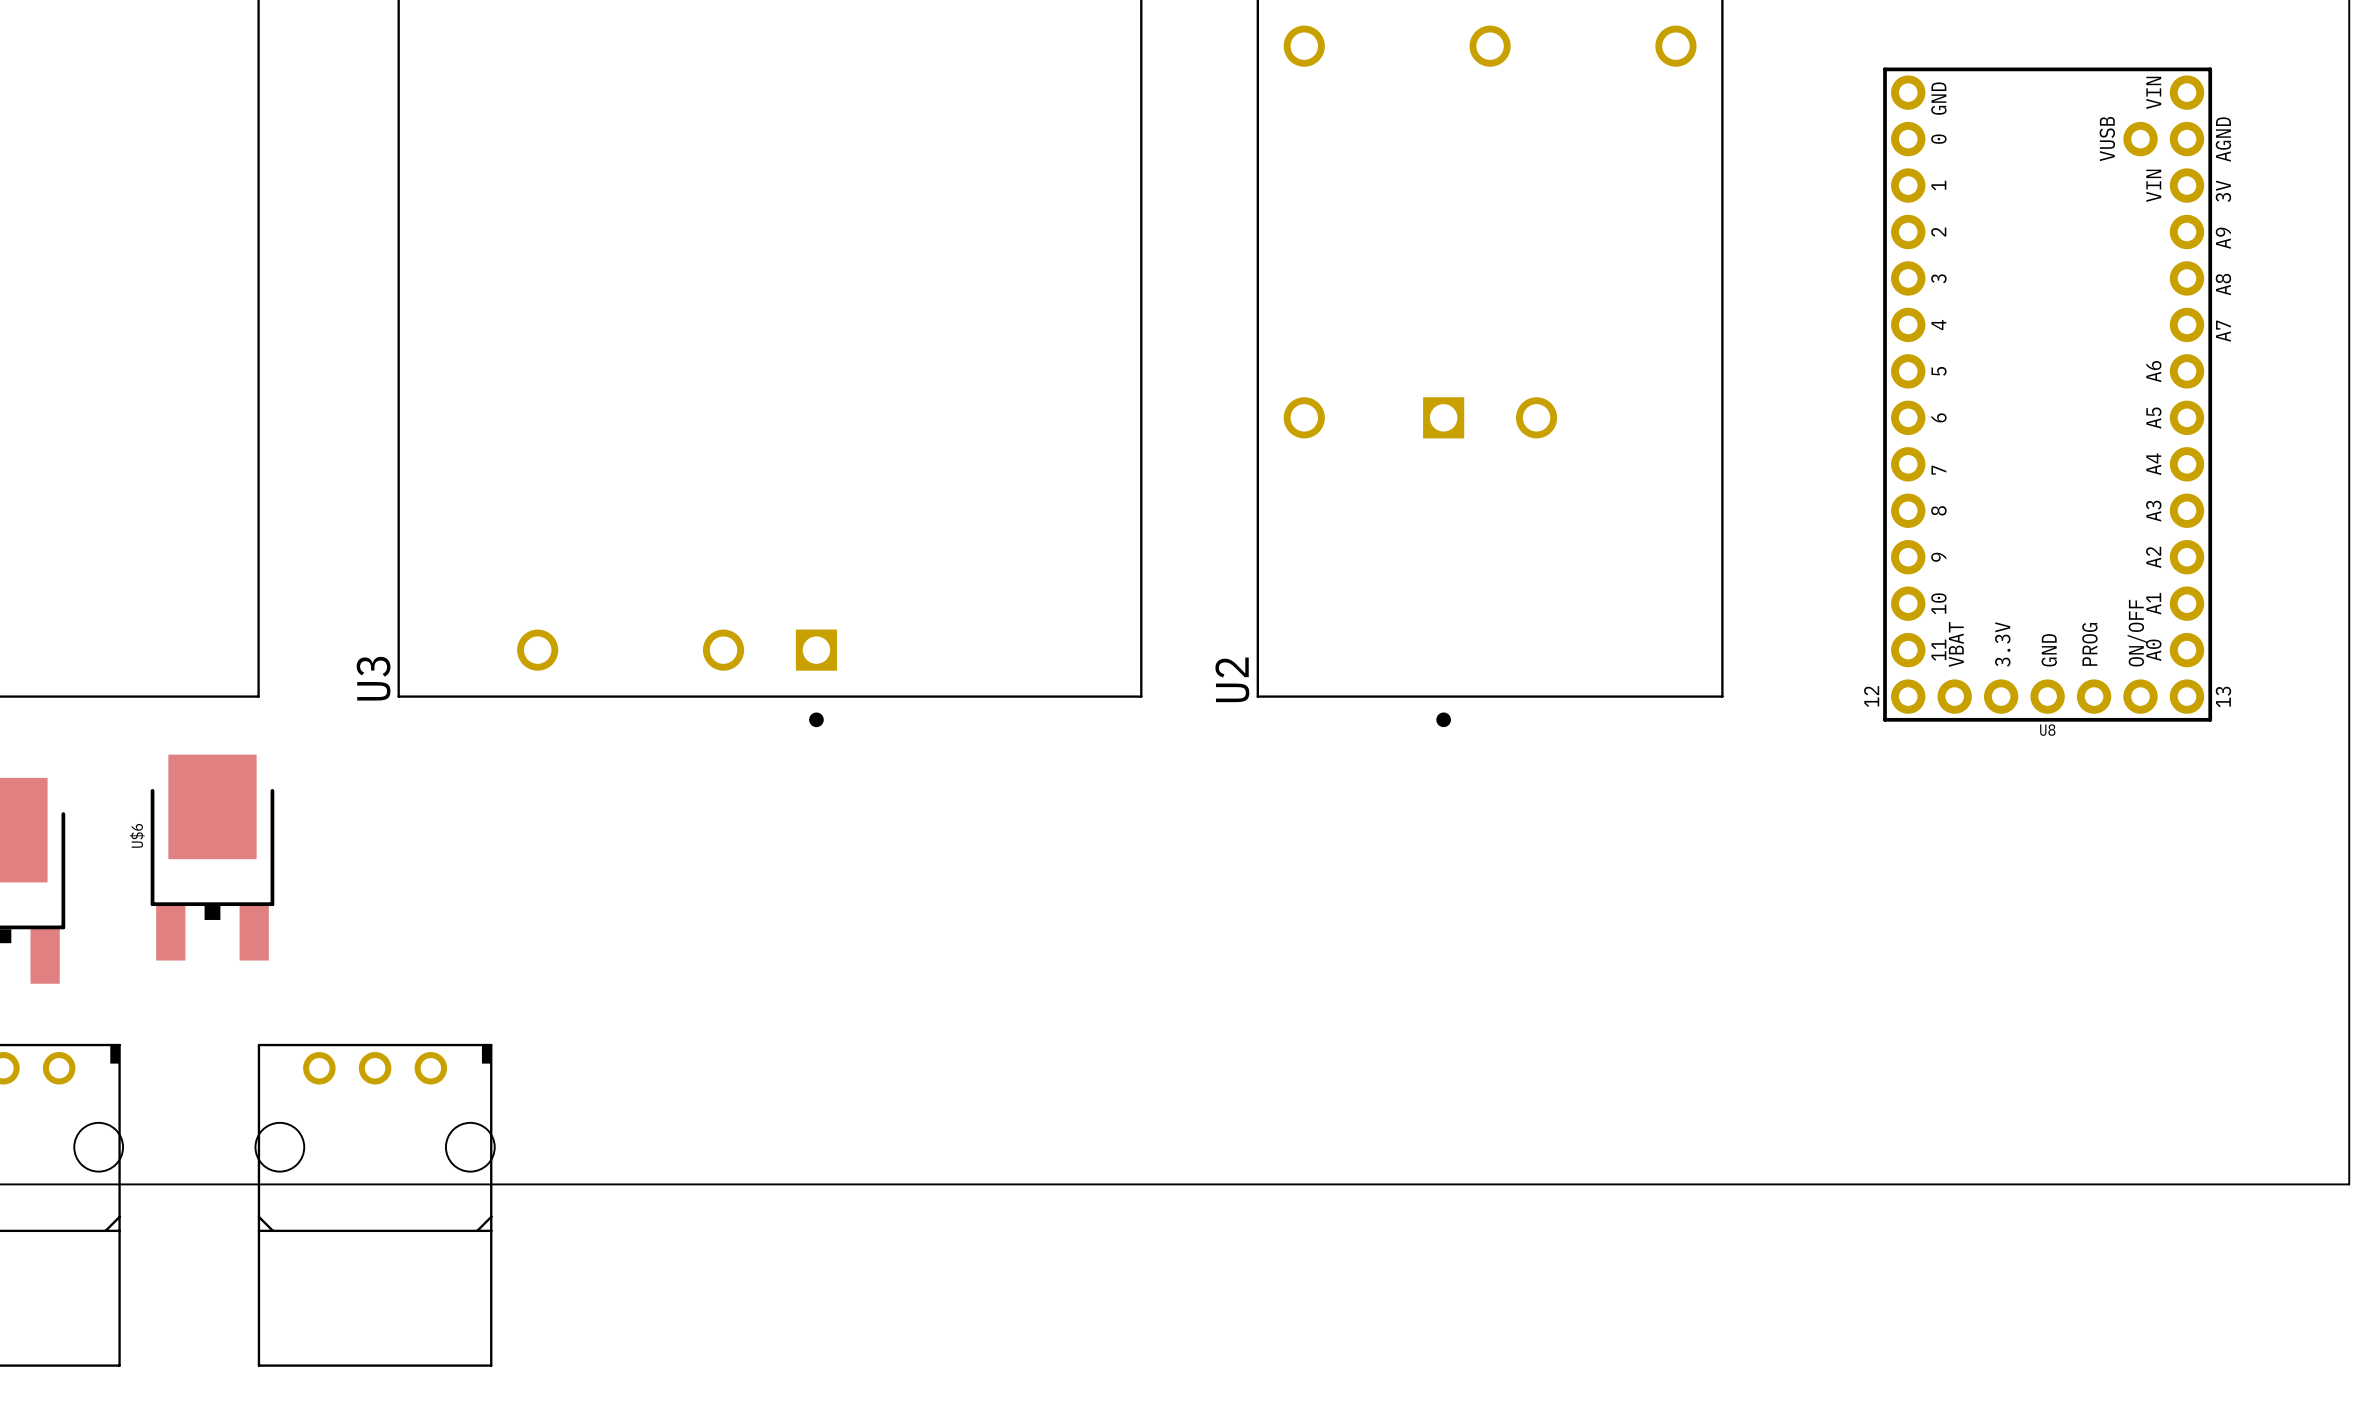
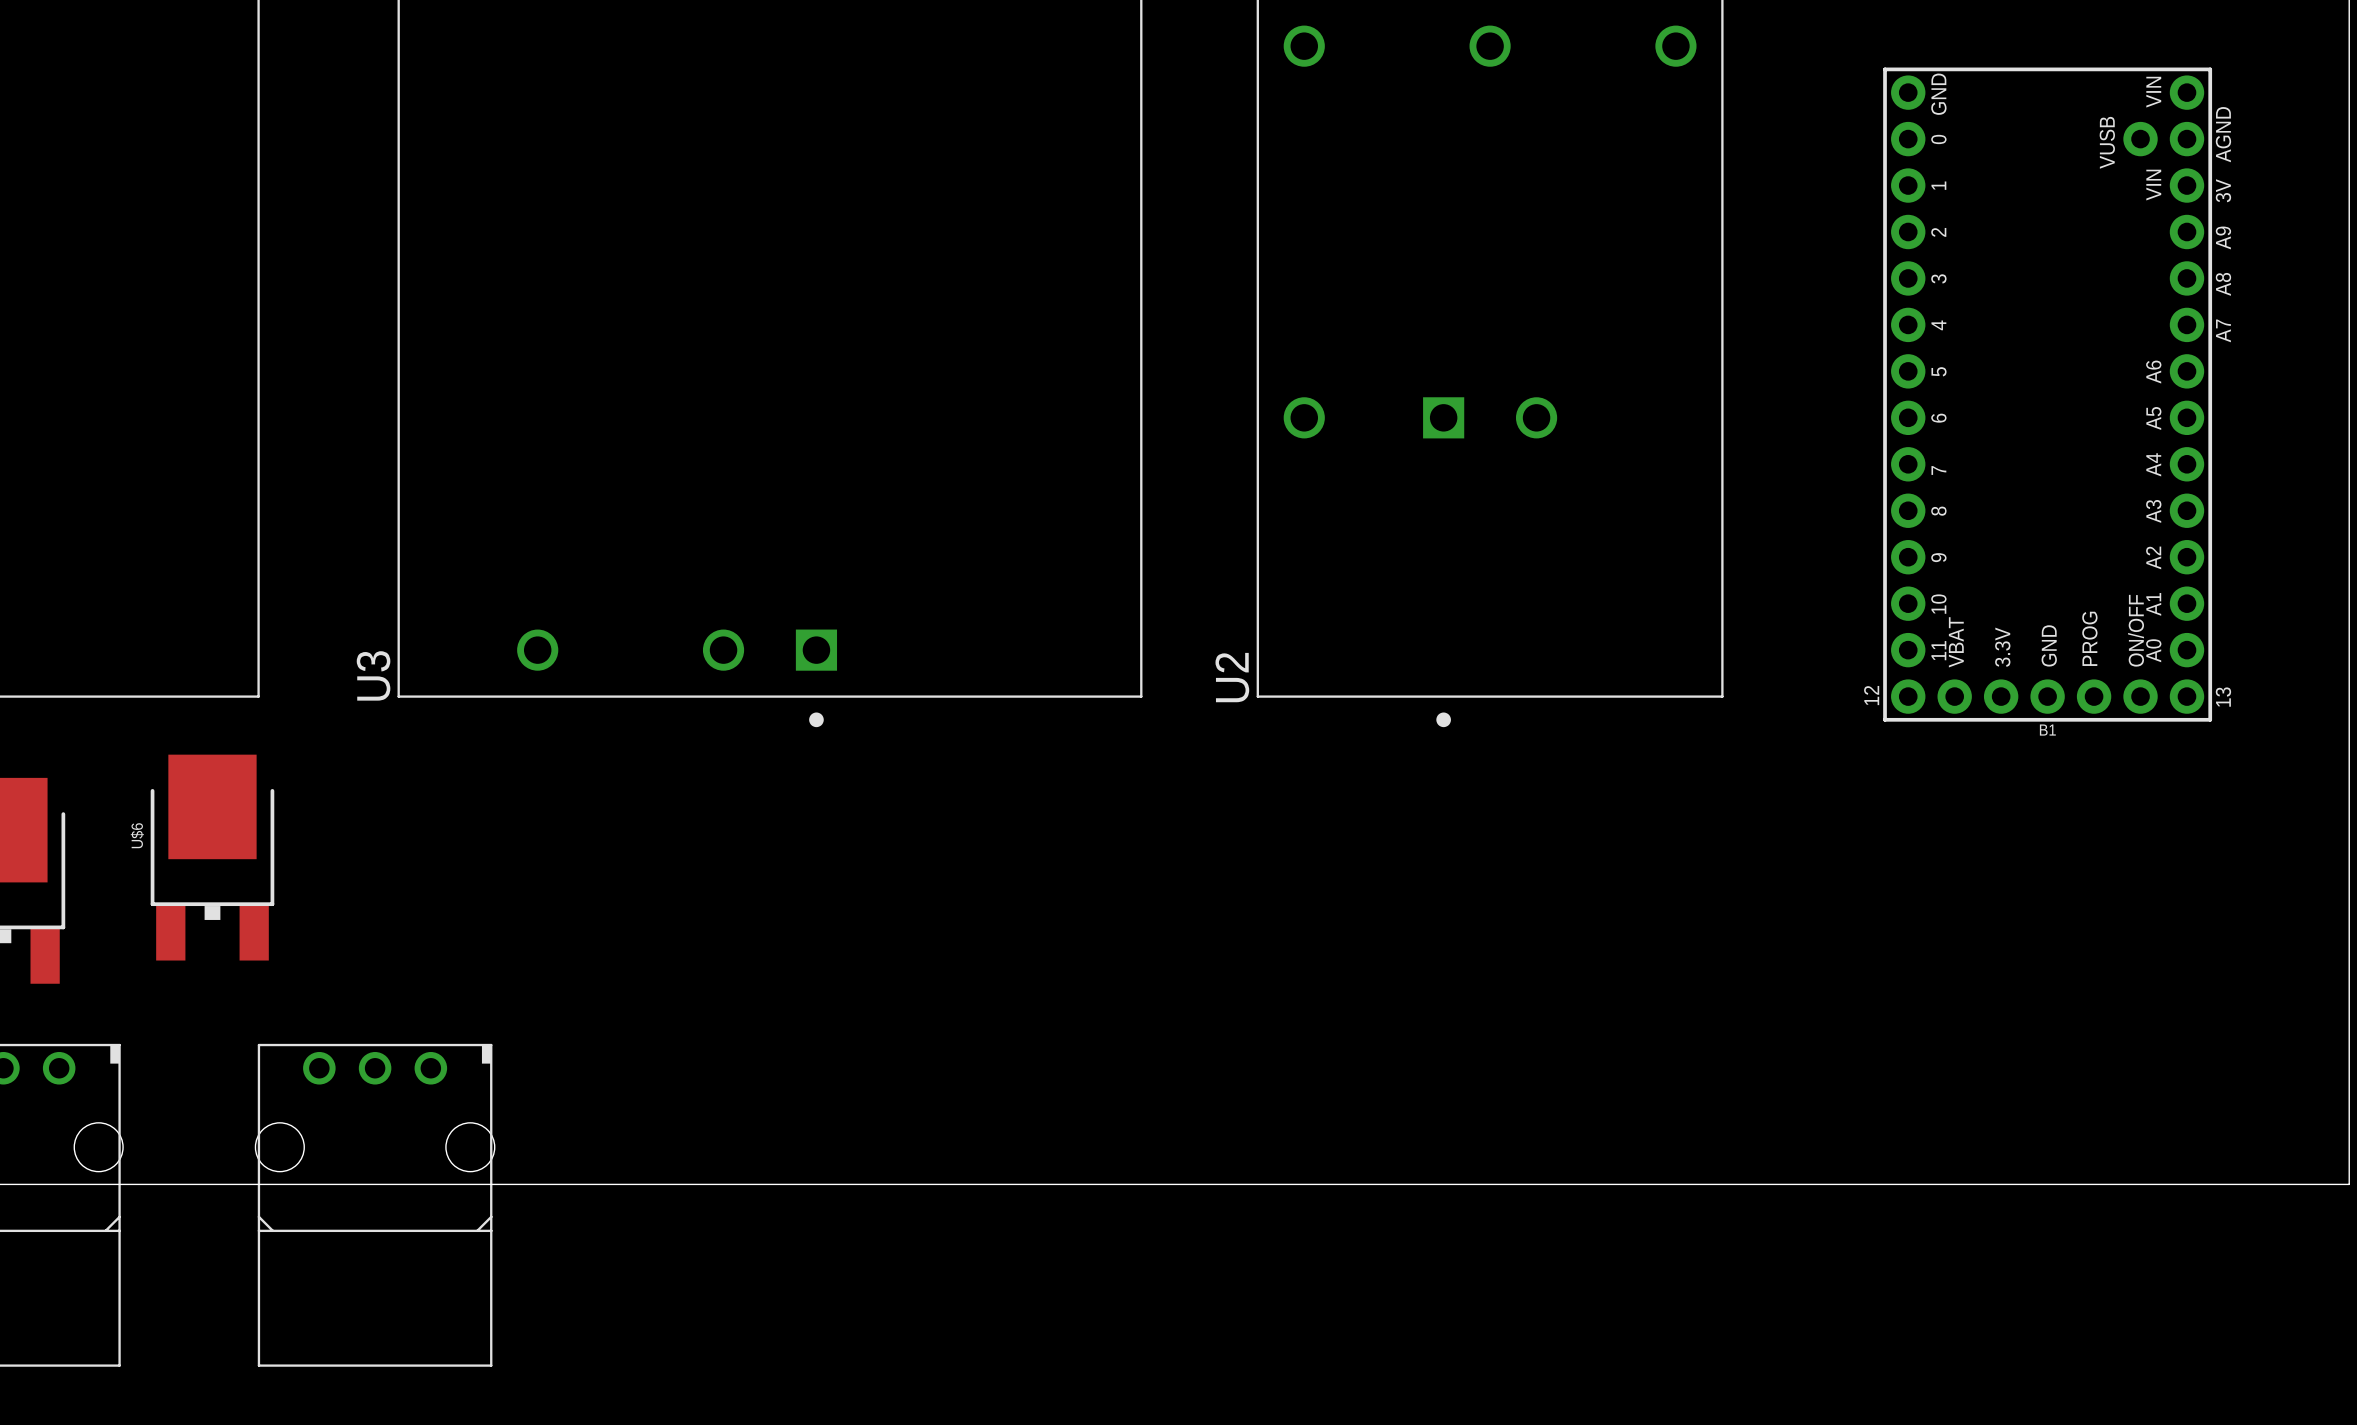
U8 name: U8 (2047, 730) -> B1 (2047, 730)

